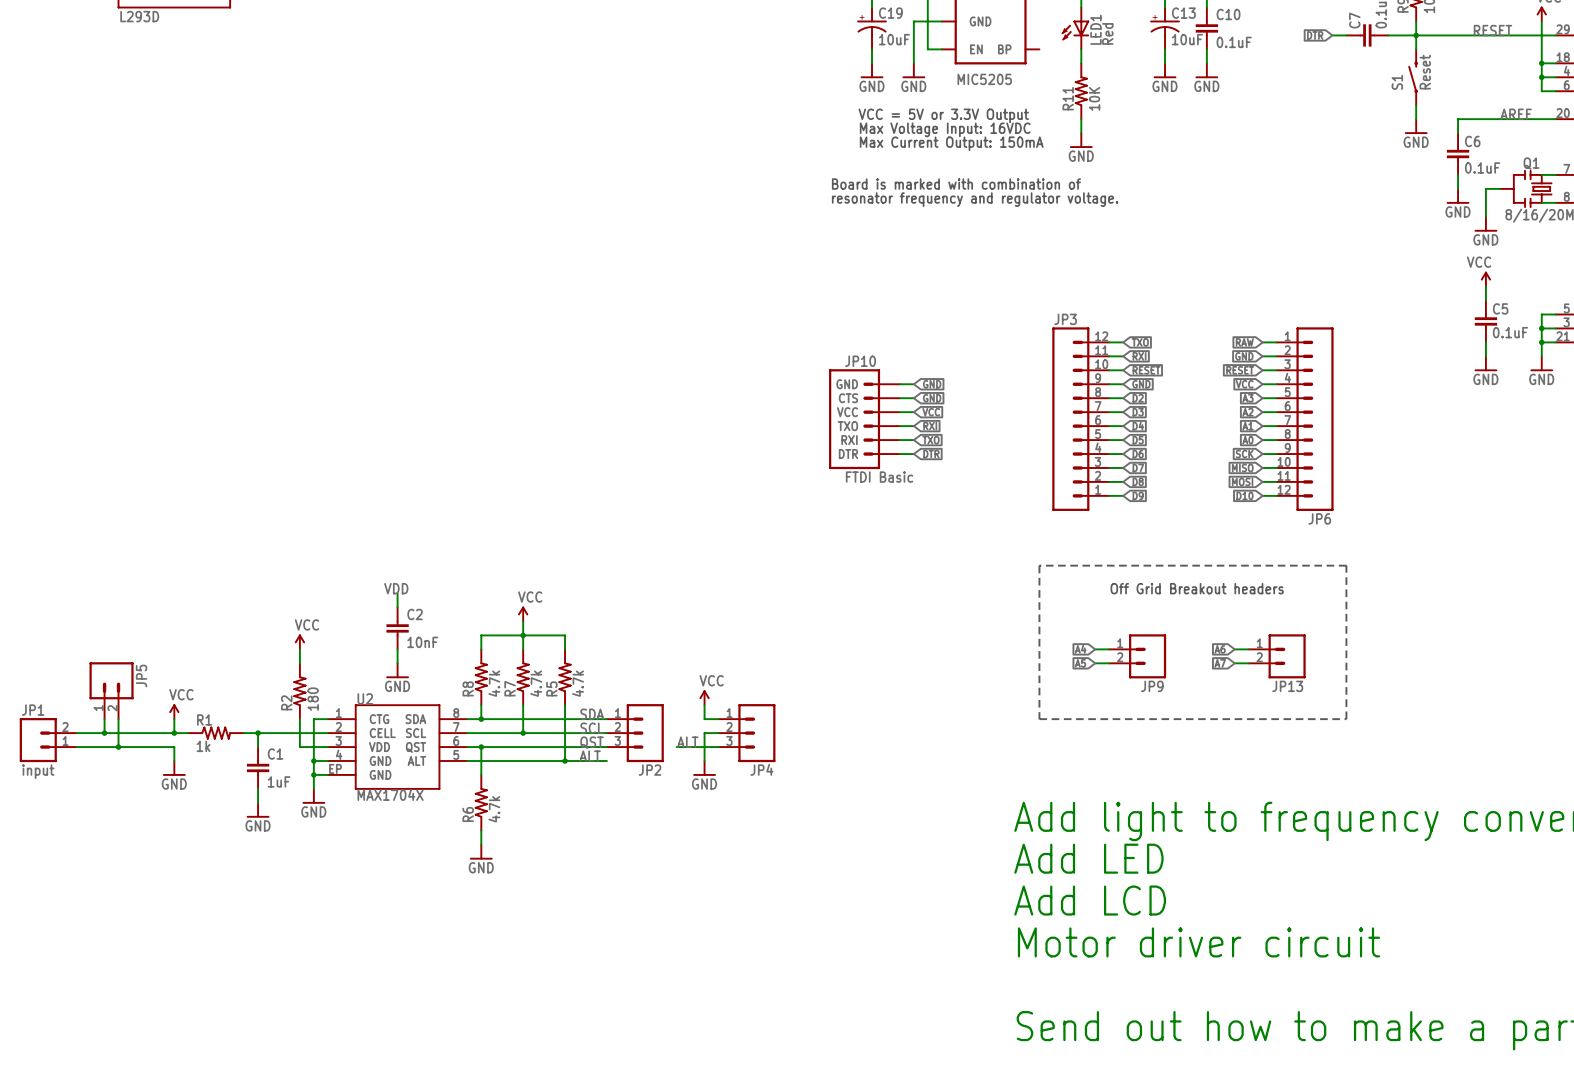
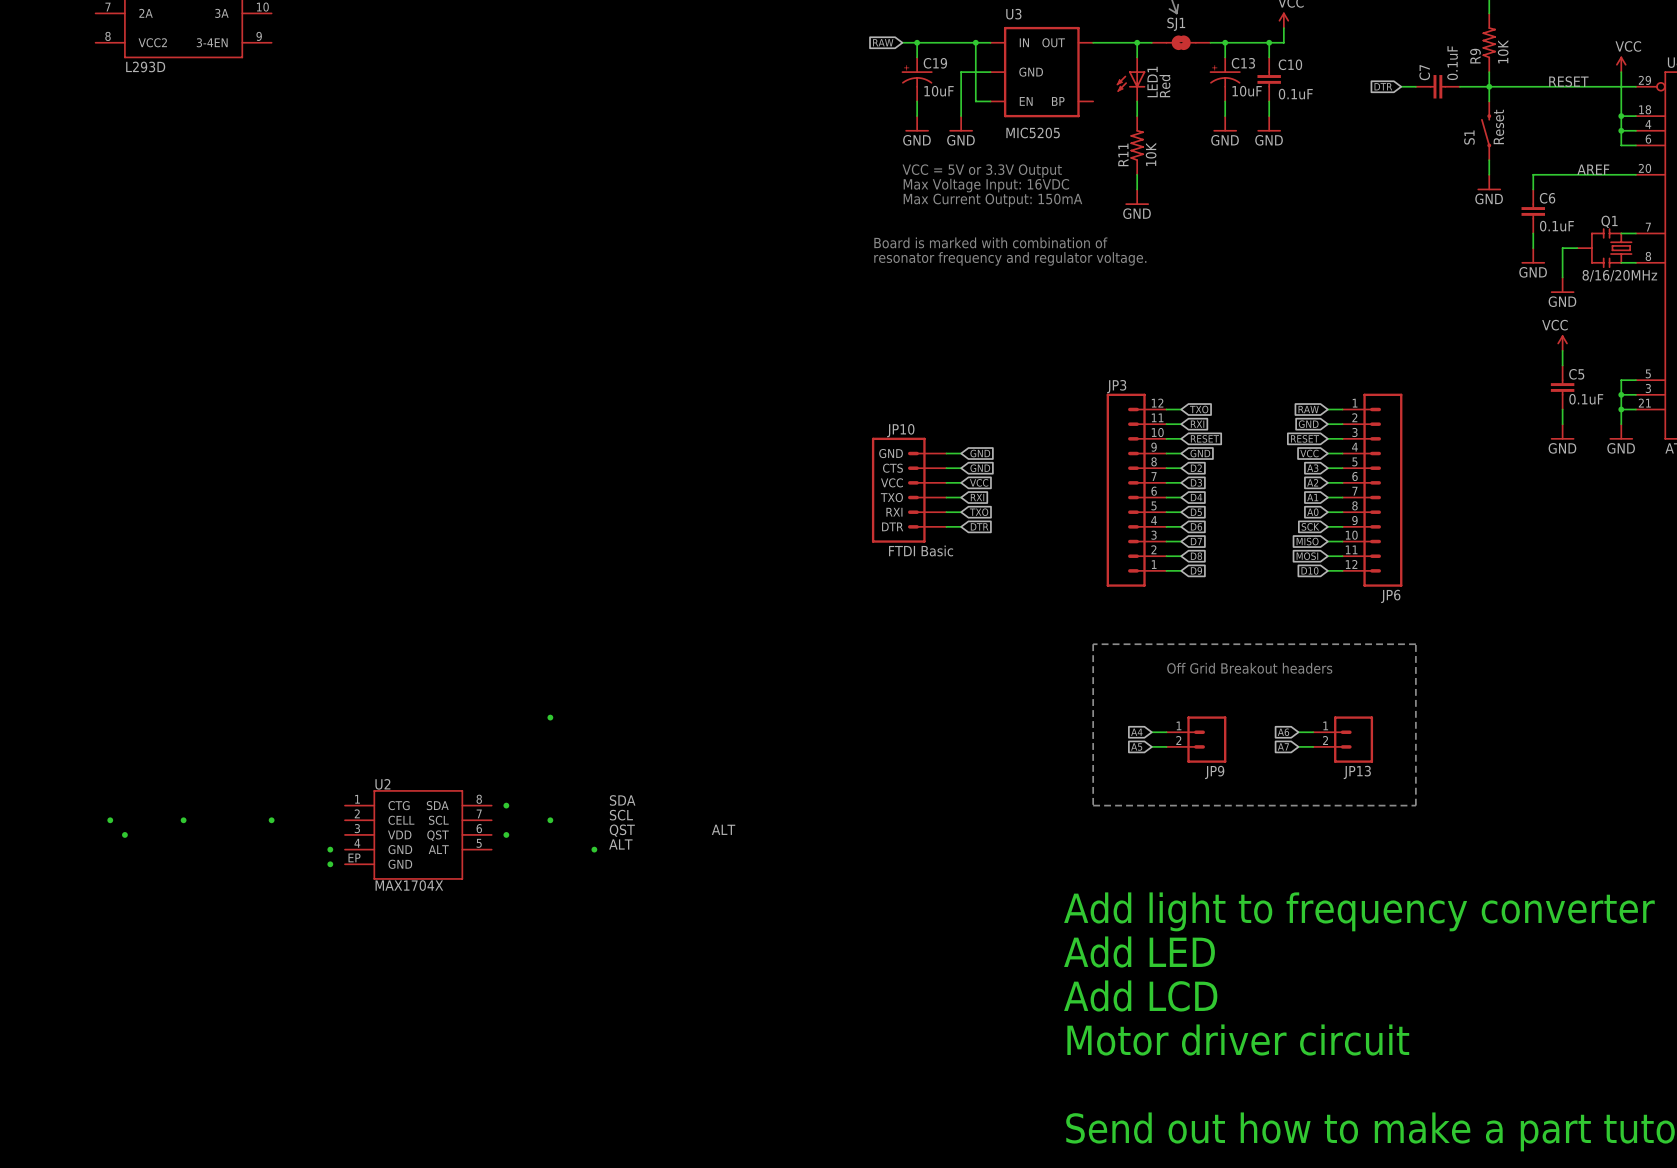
label: VDD (396, 588) -> none
wire: (397, 593) (397, 607) -> none
power symbol: VCC (523, 614) -> none
wire: (523, 621) (523, 649) -> none
C2: 10nF (397, 628) -> none
power symbol: VCC (299, 642) -> none
wire: (299, 649) (299, 663) -> none
wire: (397, 649) (397, 663) -> none
wire: (481, 649) (481, 635) (565, 635) (565, 649) -> none
power symbol: GND (397, 670) -> none
R8: 4.7k (481, 677) -> none
R7: 4.7k (523, 677) -> none
R5: 4.7k (565, 677) -> none
JP5: (111, 690) -> none
R2: 180 (299, 691) -> none
power symbol: VCC (704, 697) -> none
wire: (481, 705) (481, 719) -> none
wire: (523, 705) (523, 733) -> none
wire: (565, 705) (565, 761) -> none
wire: (704, 705) (704, 719) (718, 719) -> none
power symbol: VCC (174, 711) -> none
wire: (104, 719) (104, 733) -> none
wire: (118, 719) (118, 747) -> none
wire: (174, 719) (174, 733) -> none
wire: (299, 719) (299, 747) (327, 747) -> none
wire: (327, 719) (313, 719) (313, 788) -> none
wire: (467, 719) (606, 719) -> none
wire: (76, 733) (188, 733) -> none
R1: 1k (216, 733) -> none
wire: (244, 733) (327, 733) -> none
wire: (258, 733) (258, 747) -> none
wire: (467, 733) (606, 733) -> none
JP2: (635, 733) -> none
wire: (718, 733) (704, 733) (704, 761) -> none
JP4: (746, 733) -> none
JP1: input (48, 740) -> none
wire: (76, 747) (174, 747) (174, 761) -> none
wire: (467, 747) (606, 747) -> none
wire: (481, 747) (481, 774) -> none
wire: (676, 747) (718, 747) -> none
wire: (313, 761) (327, 761) -> none
wire: (467, 761) (606, 761) -> none
C1: 1uF (258, 767) -> none
power symbol: GND (174, 768) -> none
power symbol: GND (704, 768) -> none
wire: (313, 774) (327, 774) -> none
wire: (258, 788) (258, 802) -> none
power symbol: GND (313, 796) -> none
R6: 4.7k (481, 802) -> none
power symbol: GND (258, 810) -> none
wire: (481, 830) (481, 844) -> none
power symbol: GND (481, 852) -> none

